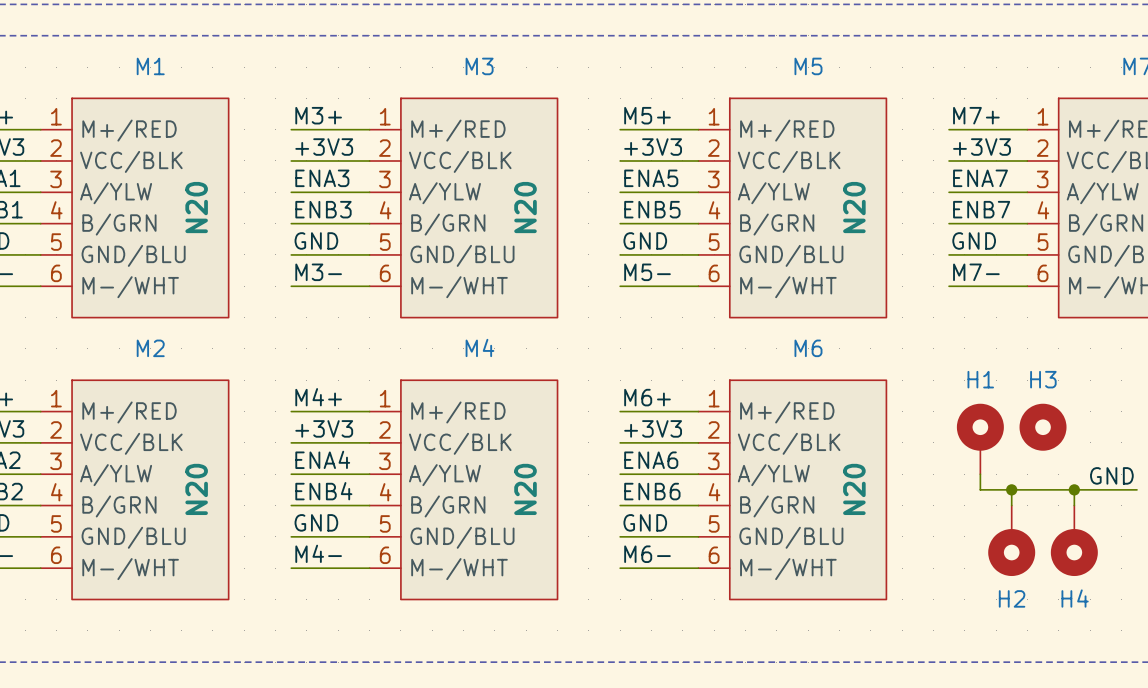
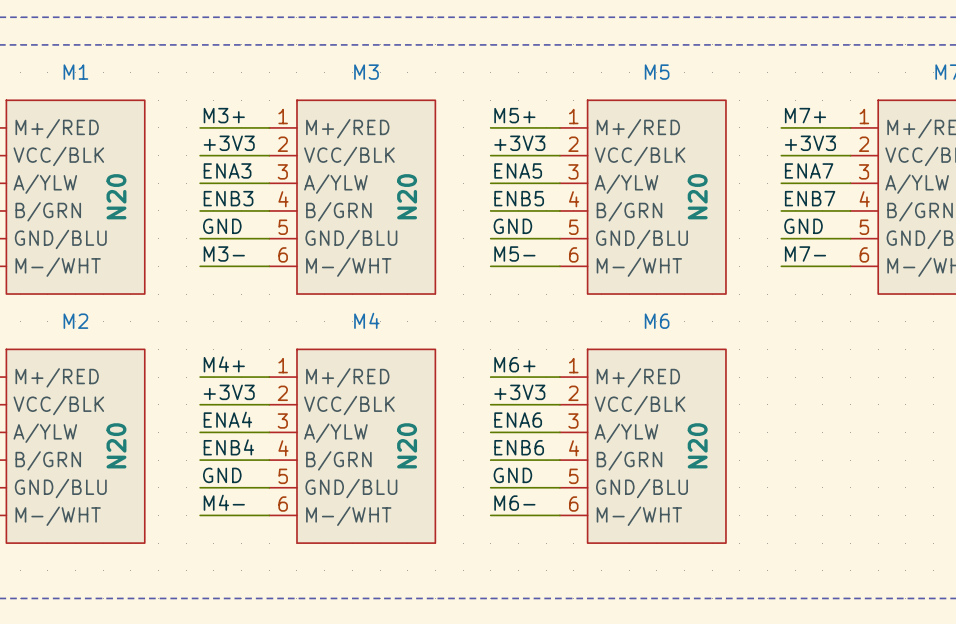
H3: (1043, 427) -> none
H1: (980, 438) -> none
wire: (980, 474) (980, 489) (1136, 489) -> none
label: GND (1111, 475) -> none
wire: (1011, 489) (1011, 505) -> none
junction: (1011, 489) -> none
wire: (1074, 489) (1074, 505) -> none
junction: (1074, 489) -> none
H2: (1011, 540) -> none
H4: (1074, 540) -> none

